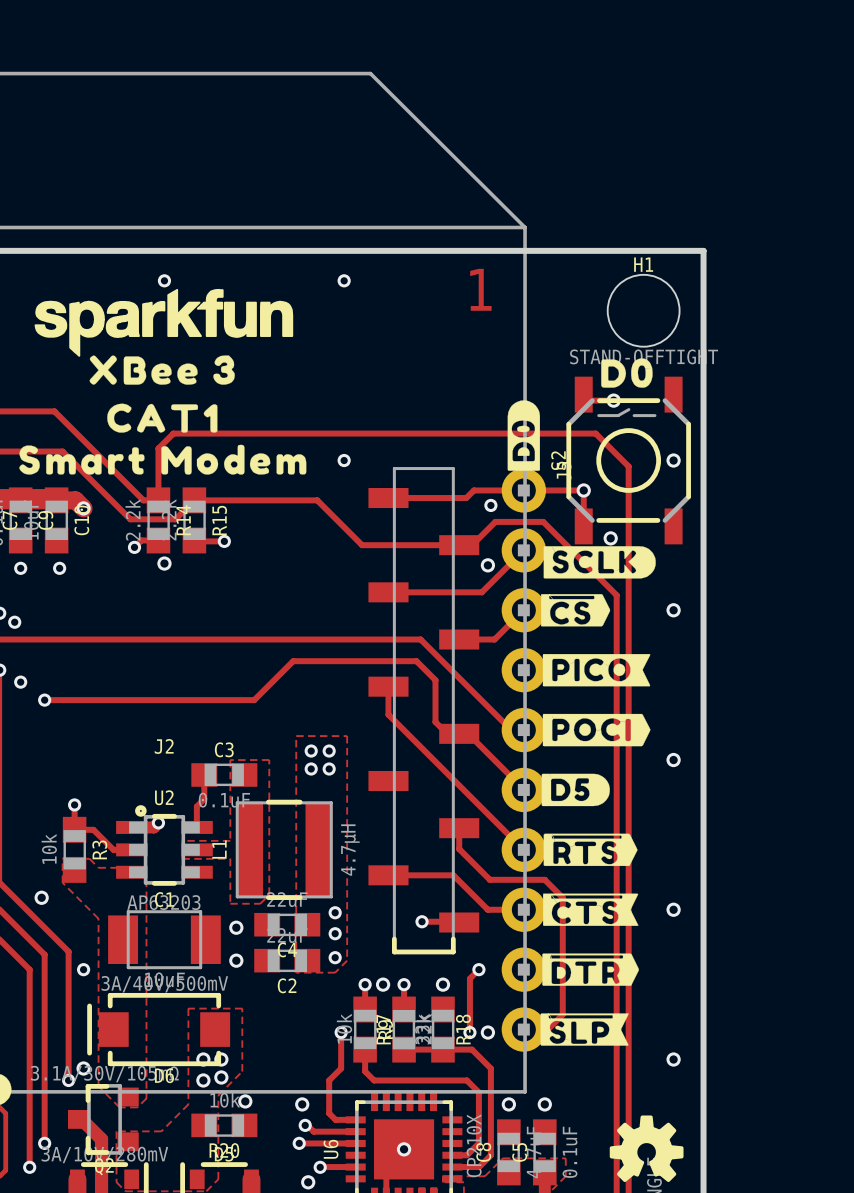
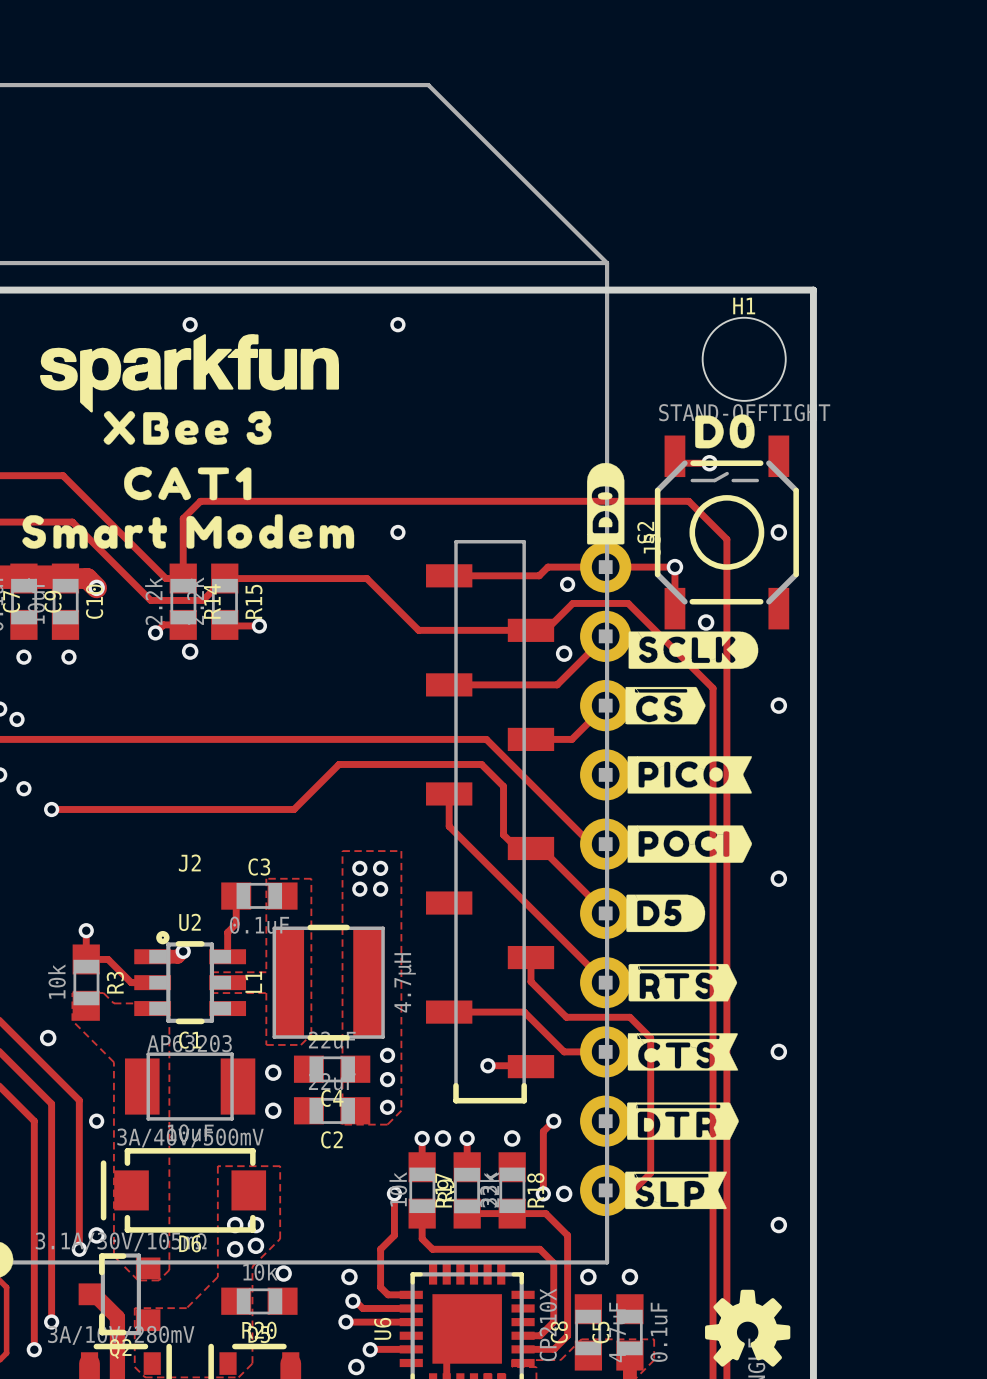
text: 1 (480, 289) -> none
via: (404, 1149) -> none

